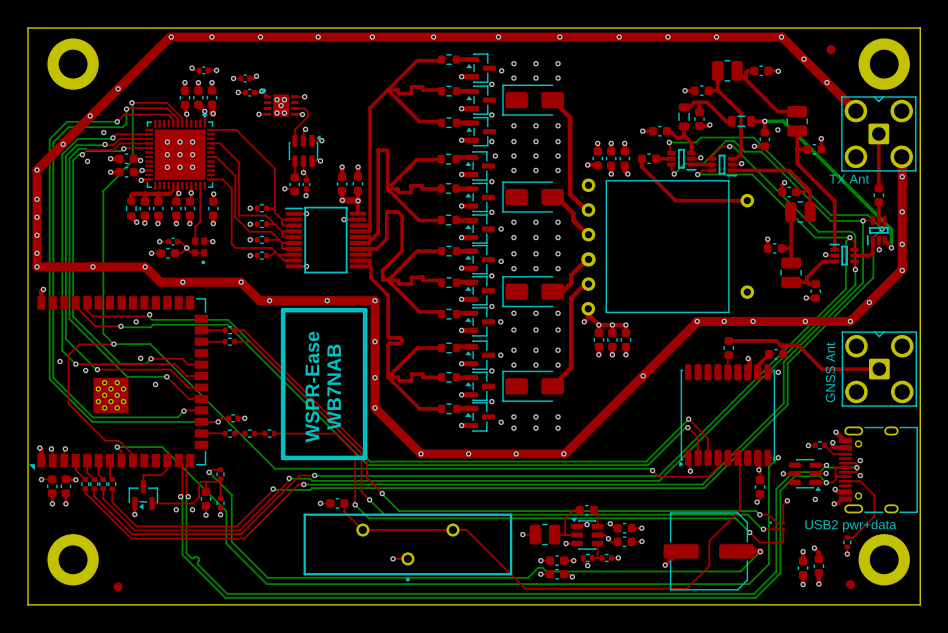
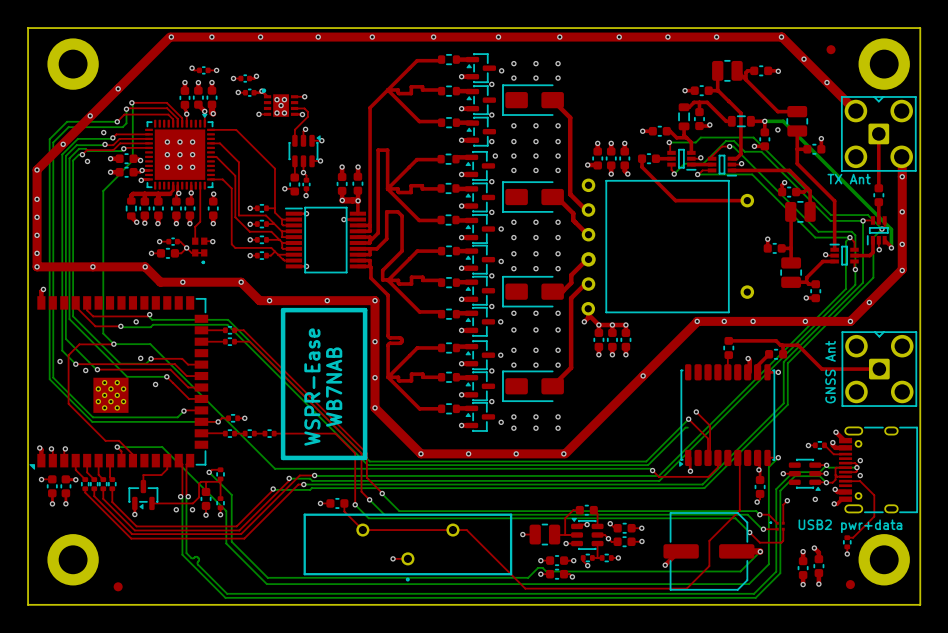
top track: none -> (696, 411) (710, 425) (710, 457)
top track: (687, 427) (698, 437) (698, 457) -> none
via position: (687, 427) -> (696, 411)

